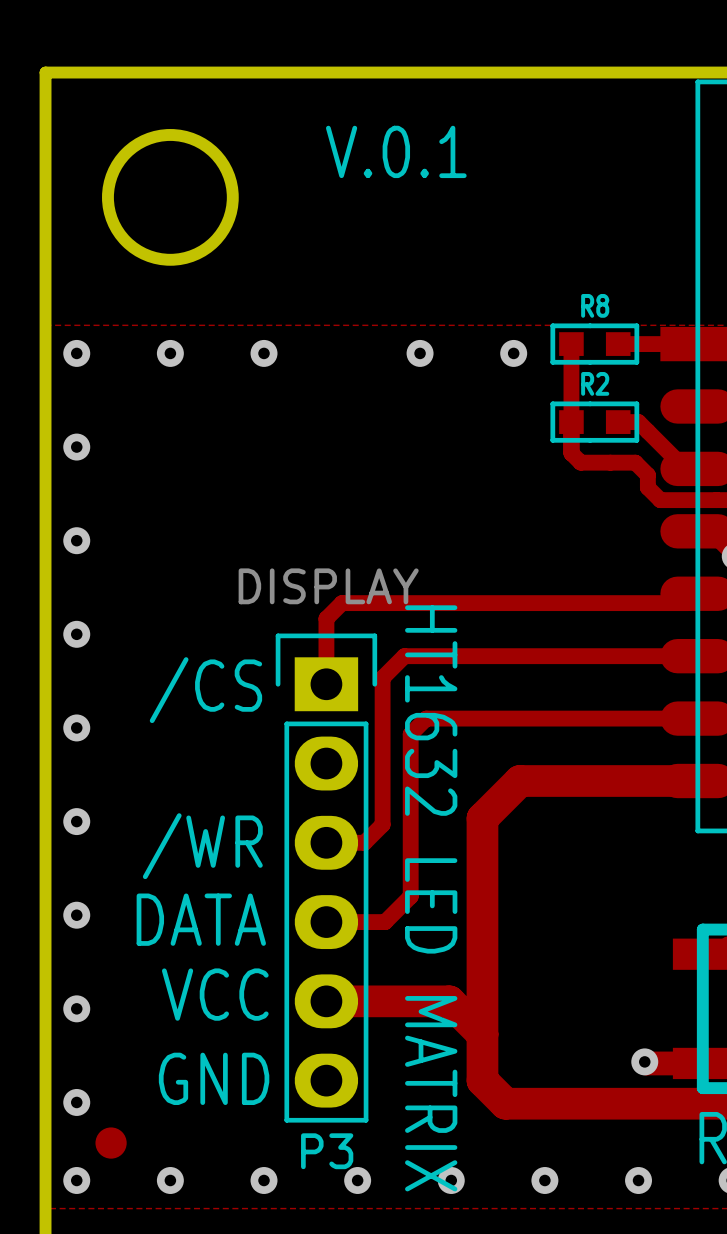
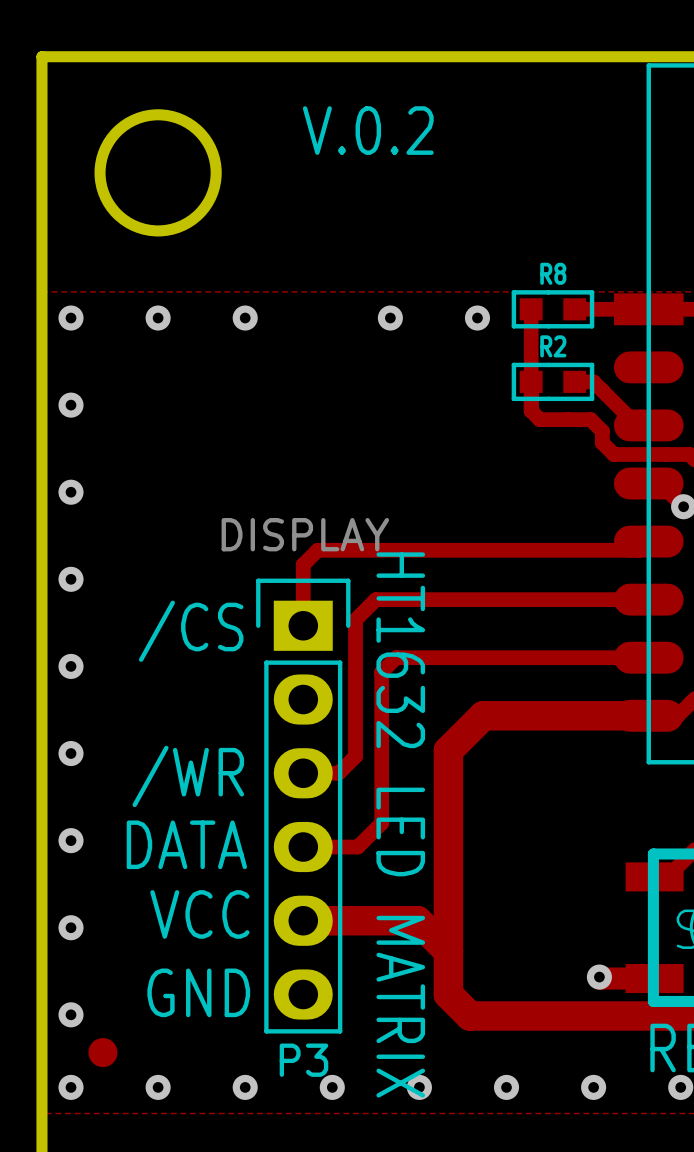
text: V.0.1 (396, 151) -> V.0.2 (368, 130)

